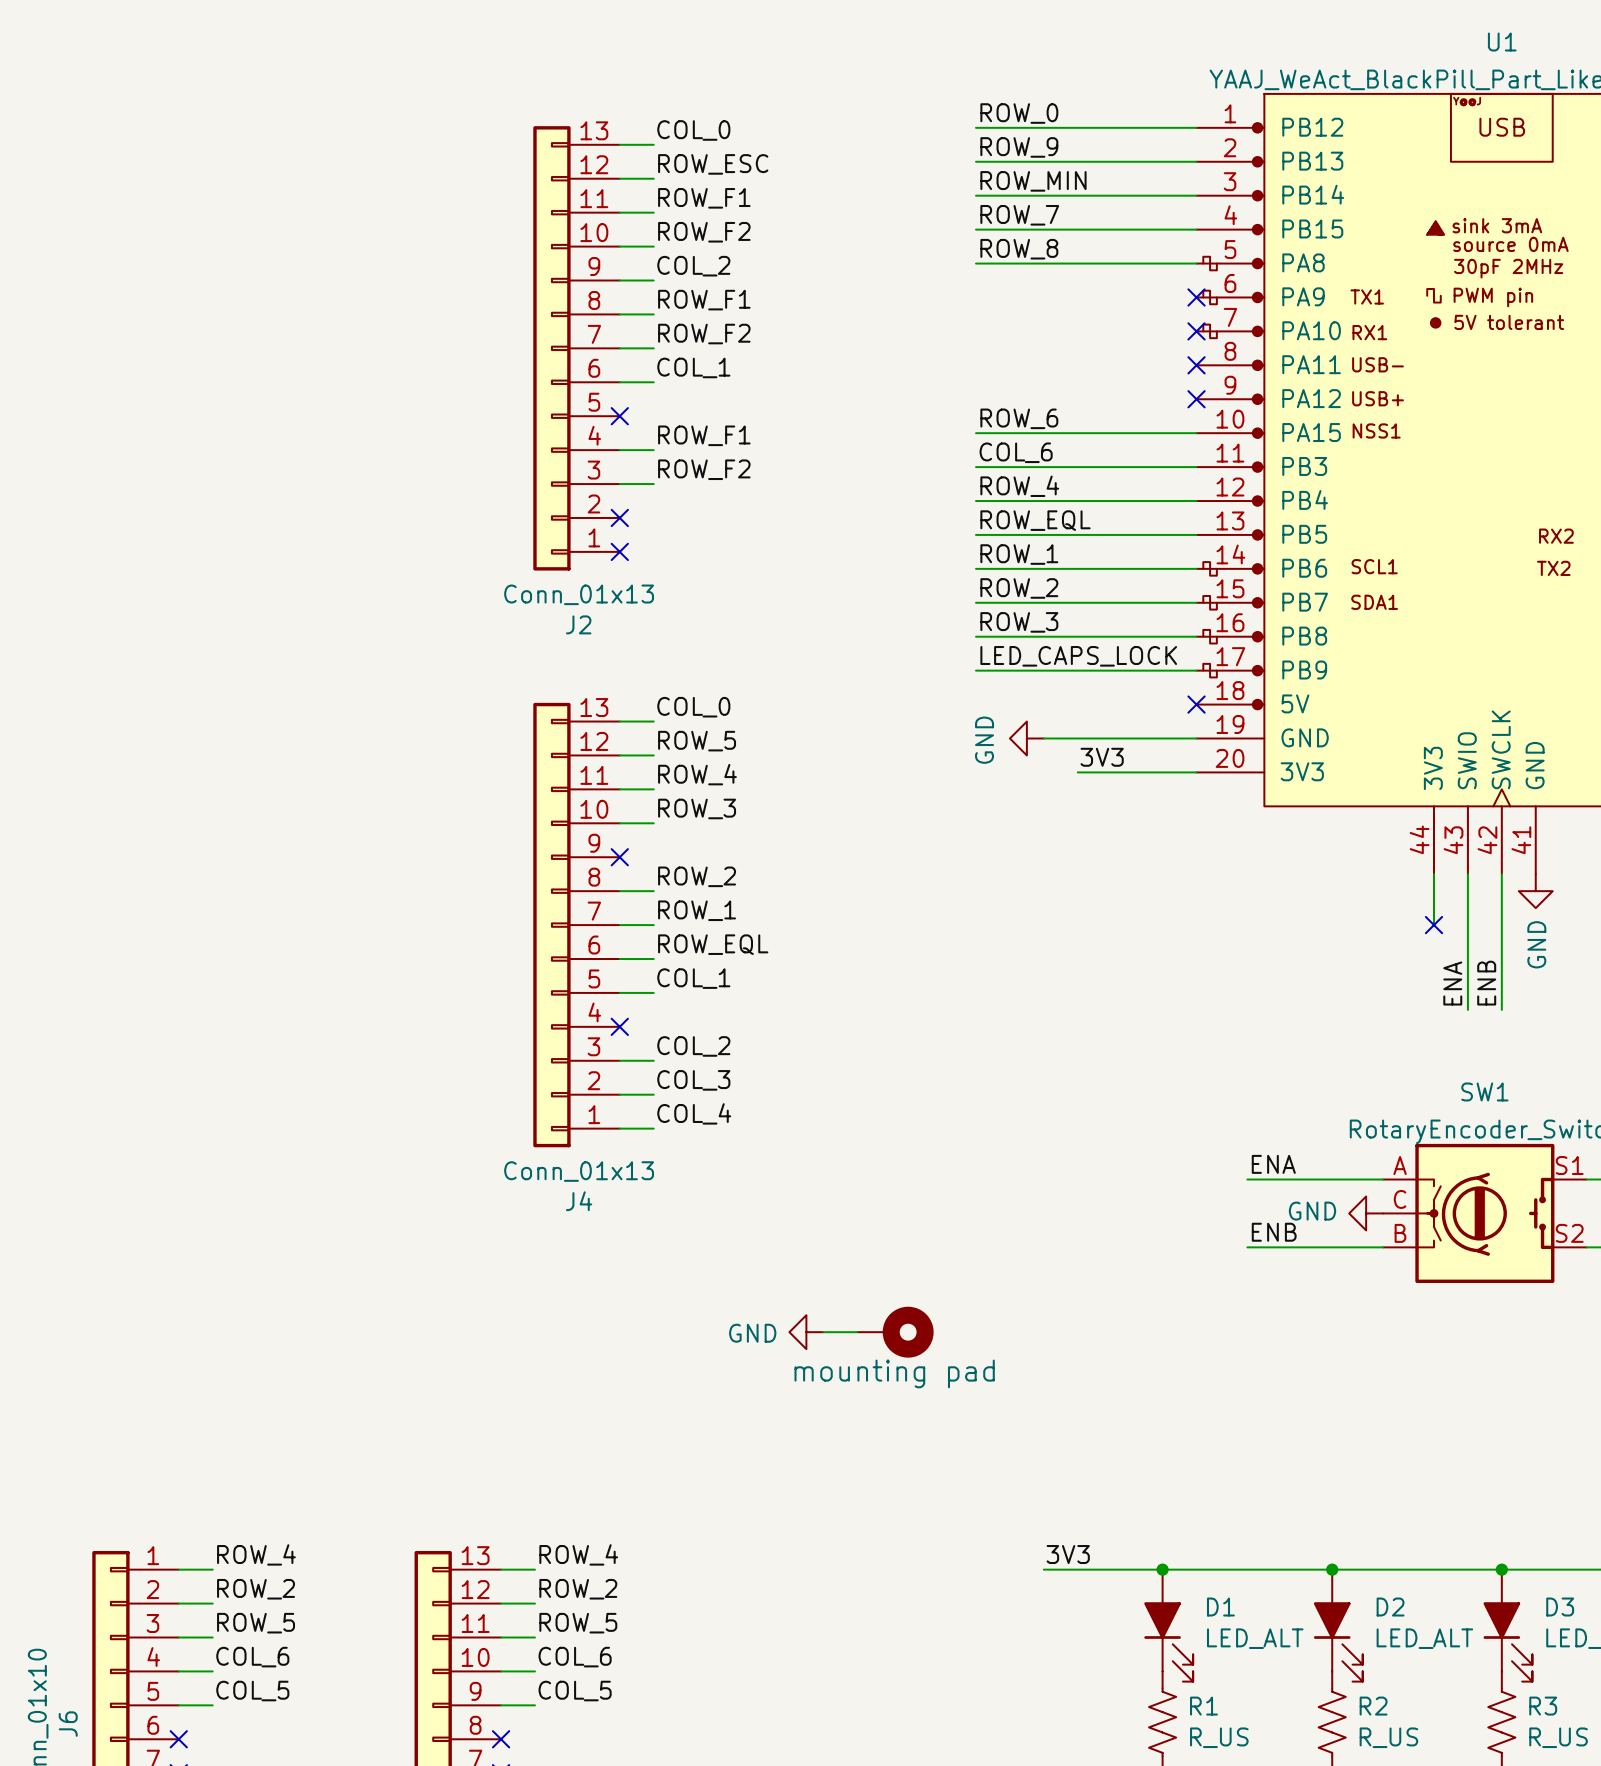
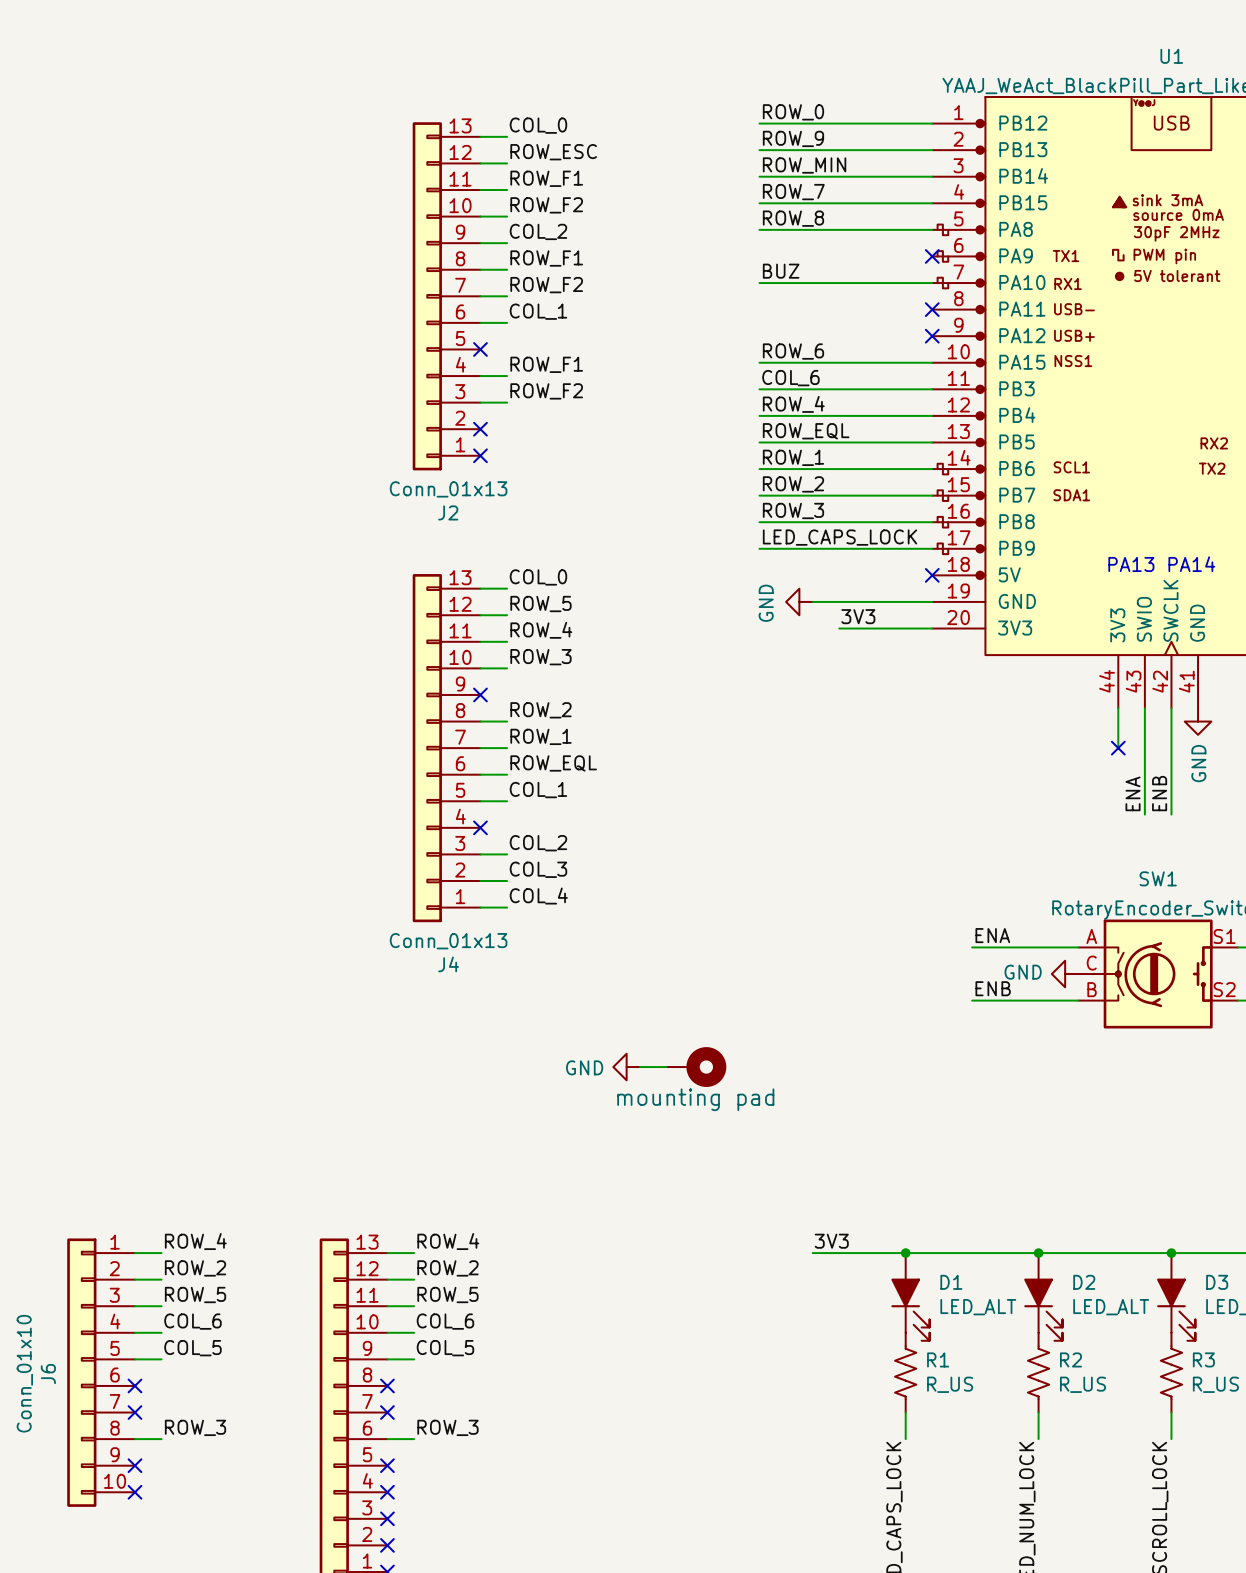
label: none -> BUZ (781, 271)
wire: none -> (759, 283) (932, 283)
no-connect mark: (1196, 331) -> none
text: none -> PA13 PA14 (1161, 564)

